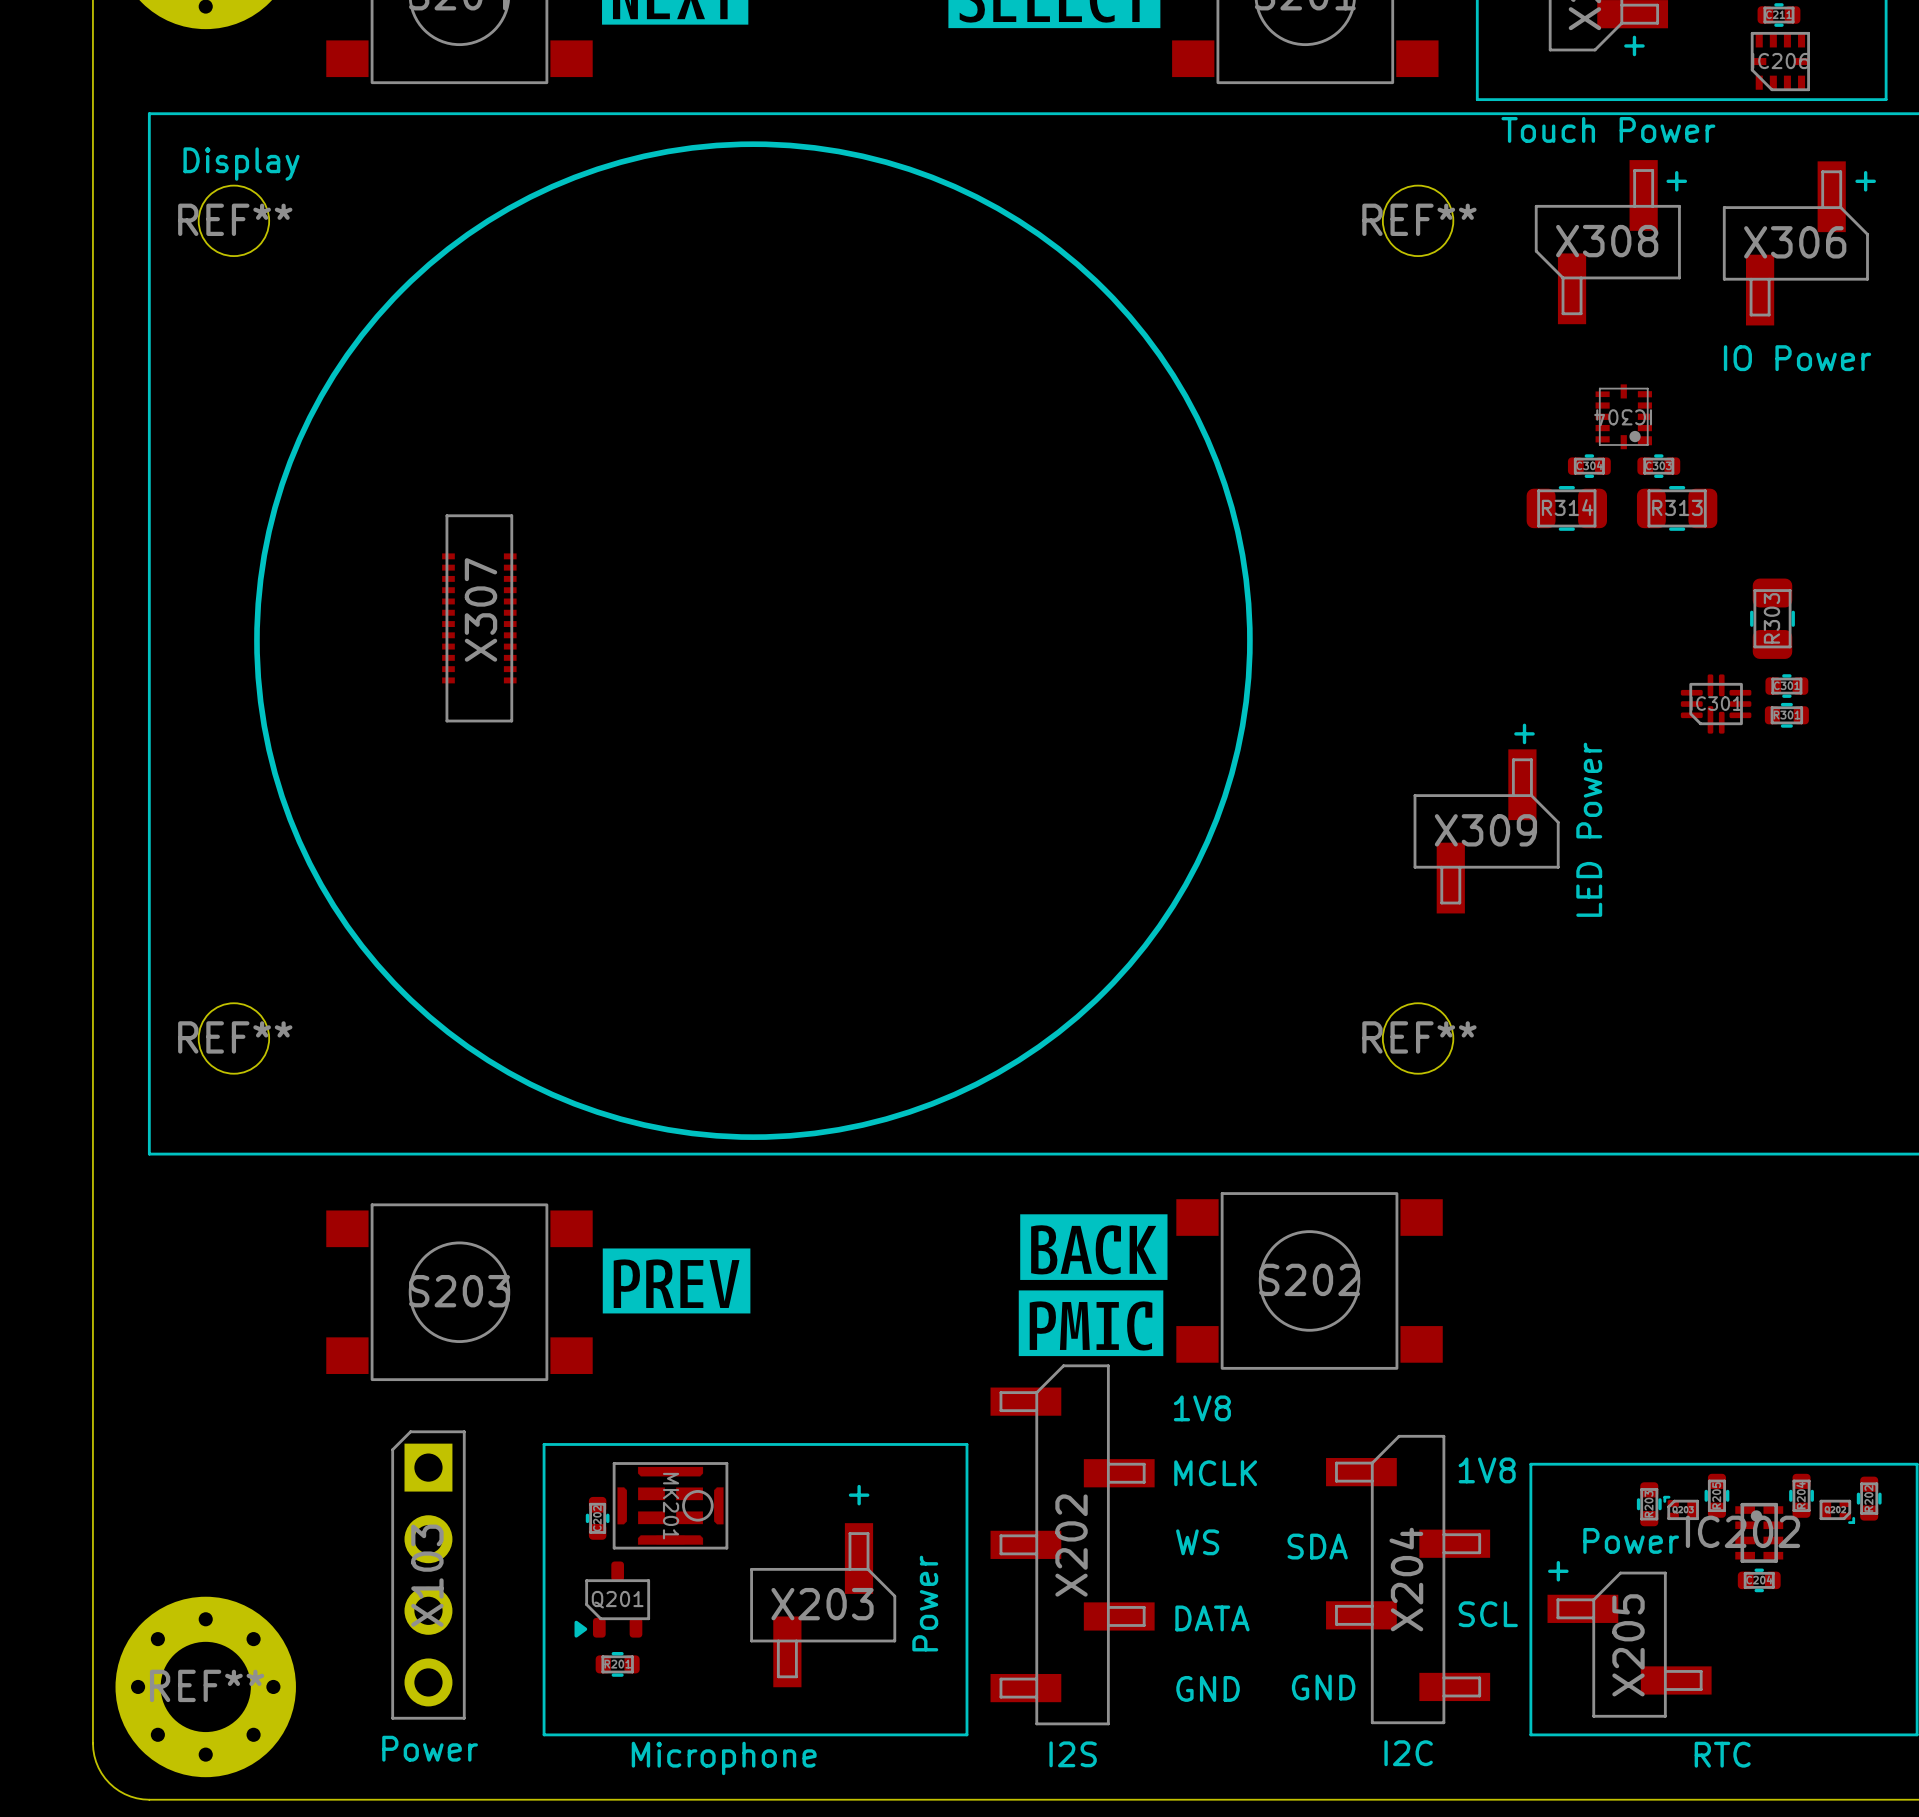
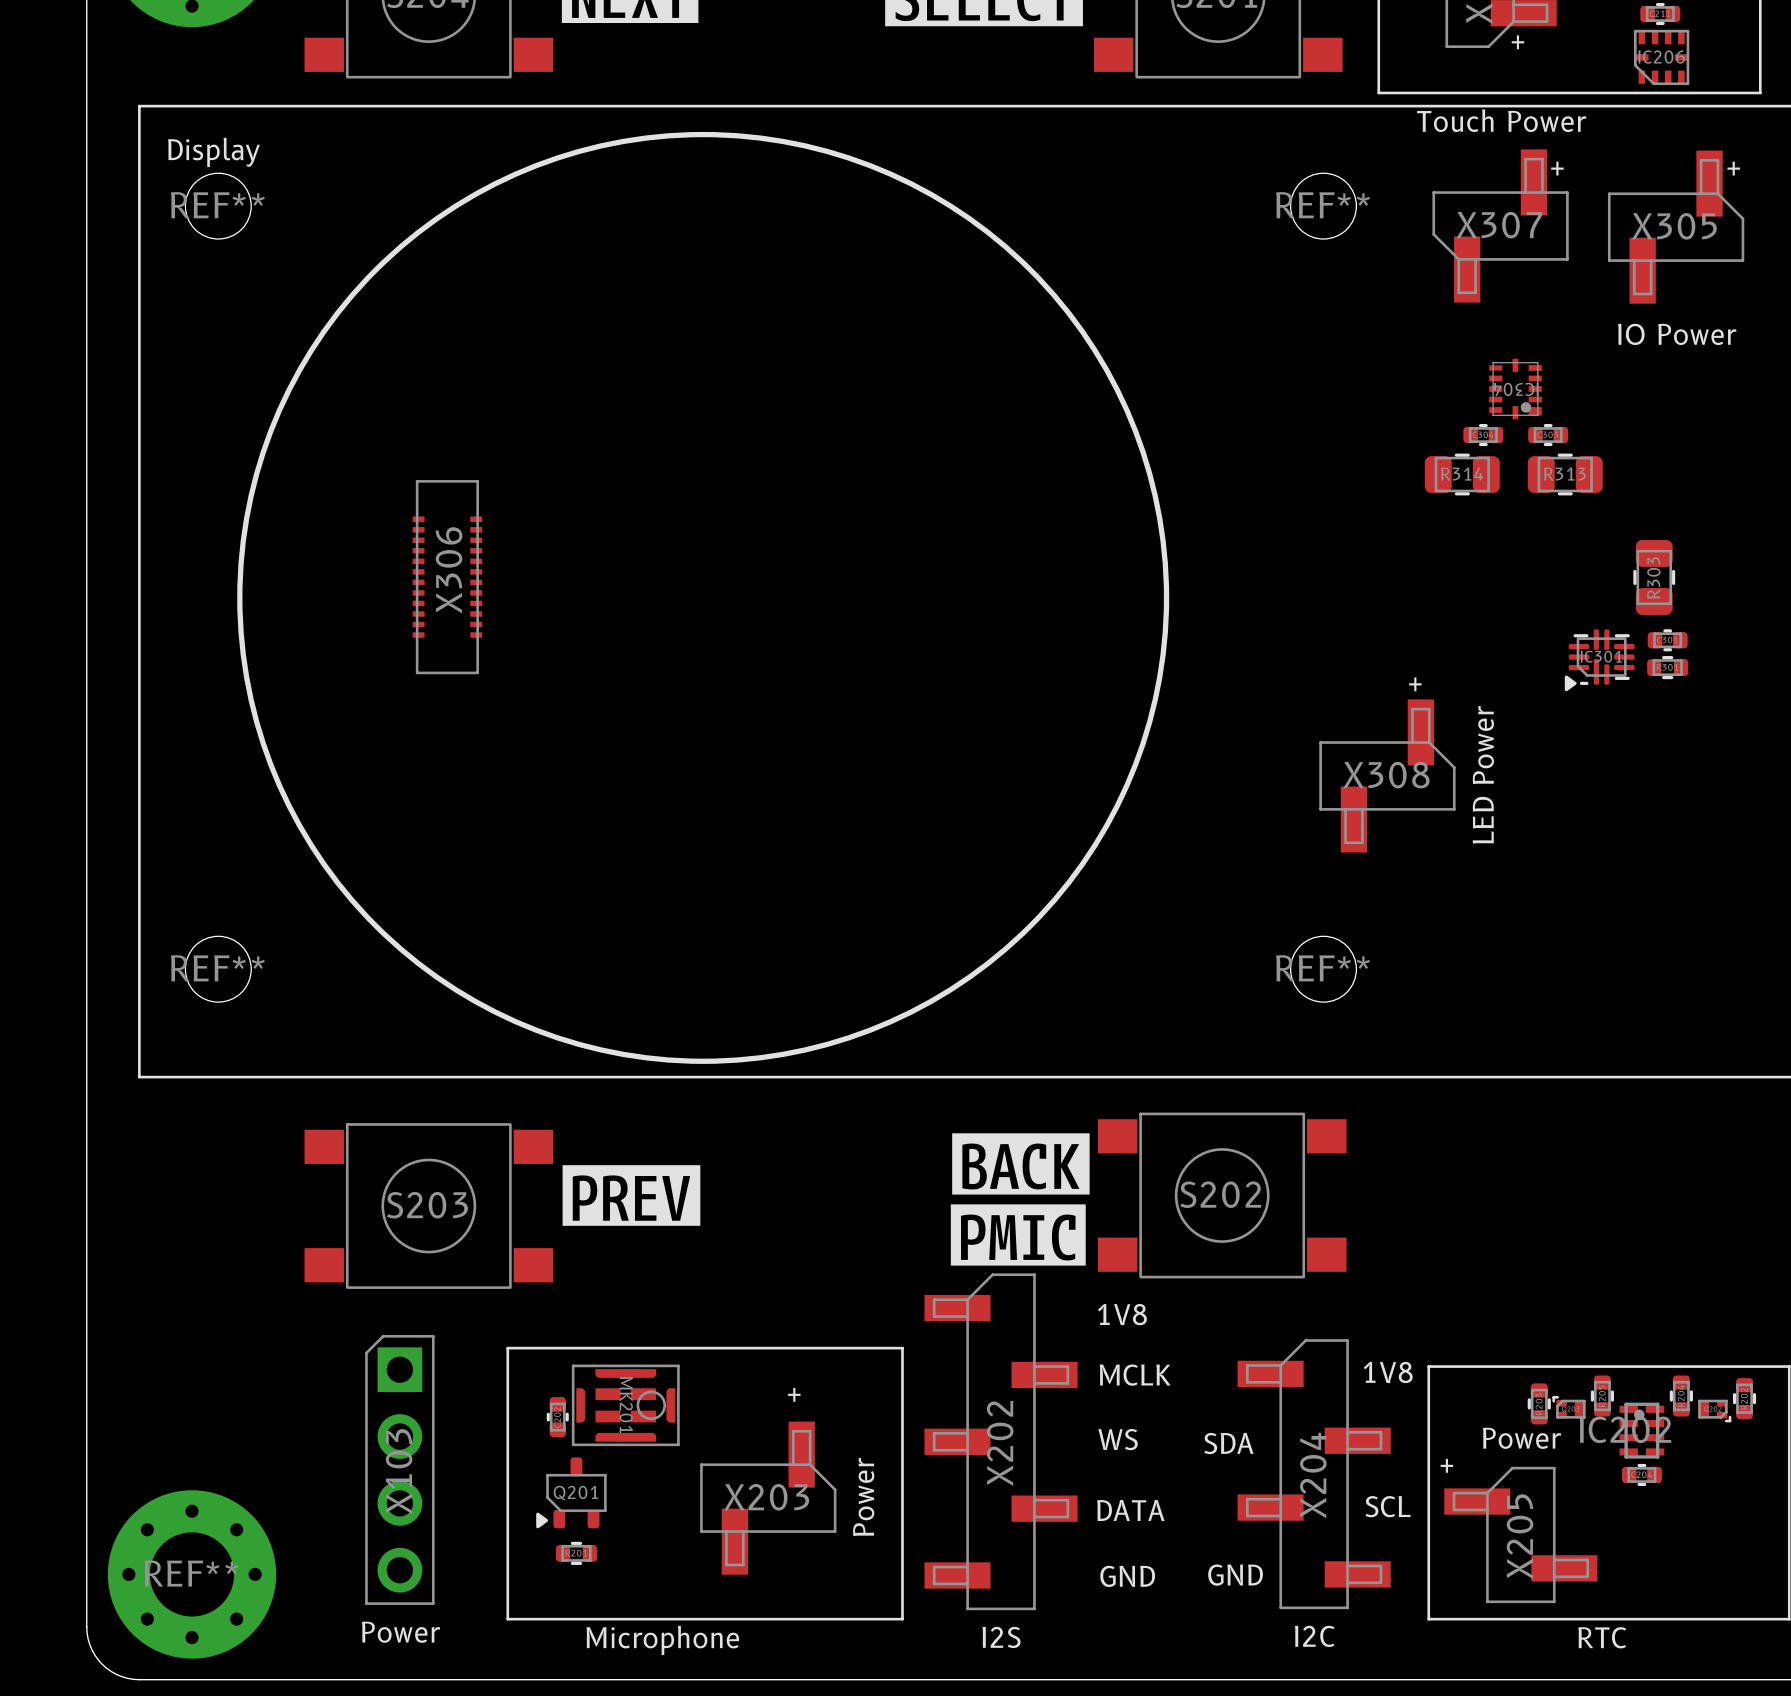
X308 name: X308 (1607, 241) -> X307 (1499, 225)
X306 name: X306 (1795, 242) -> X305 (1674, 226)
X307 name: X307 (480, 609) -> X306 (449, 570)
IC301 footprint: [1680, 674, 1752, 734] -> [1564, 629, 1635, 692]
X309 name: X309 (1485, 830) -> X308 (1386, 775)

